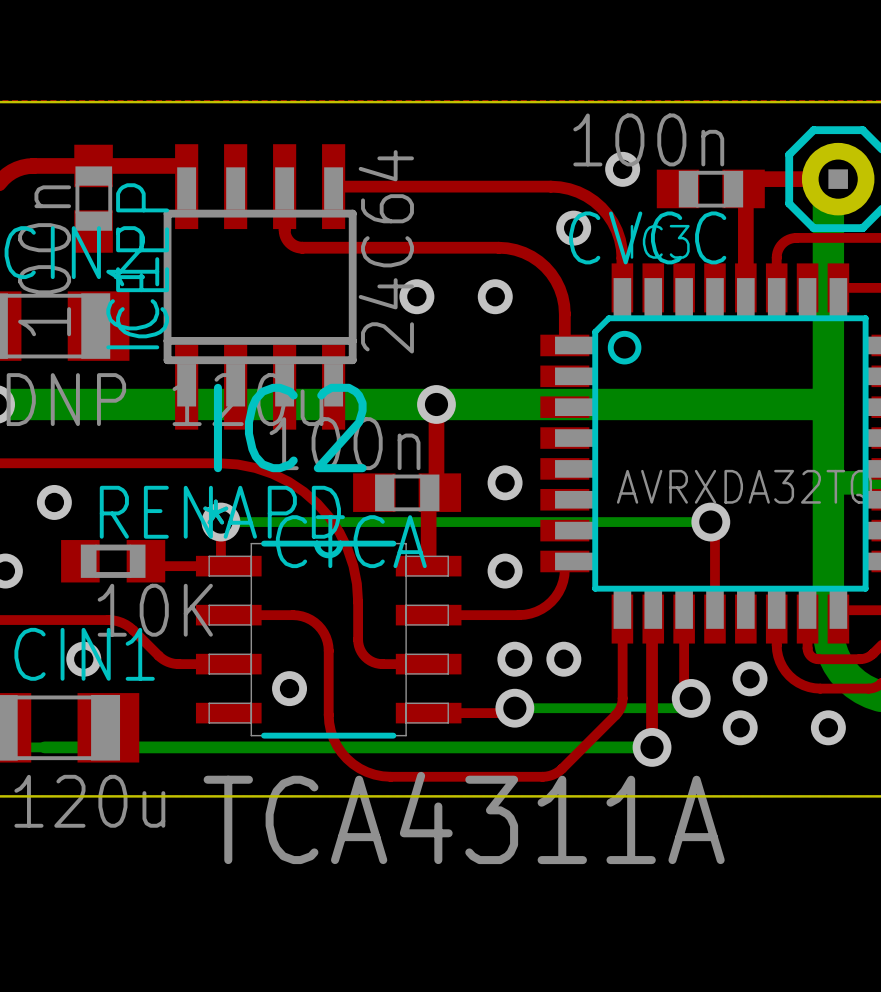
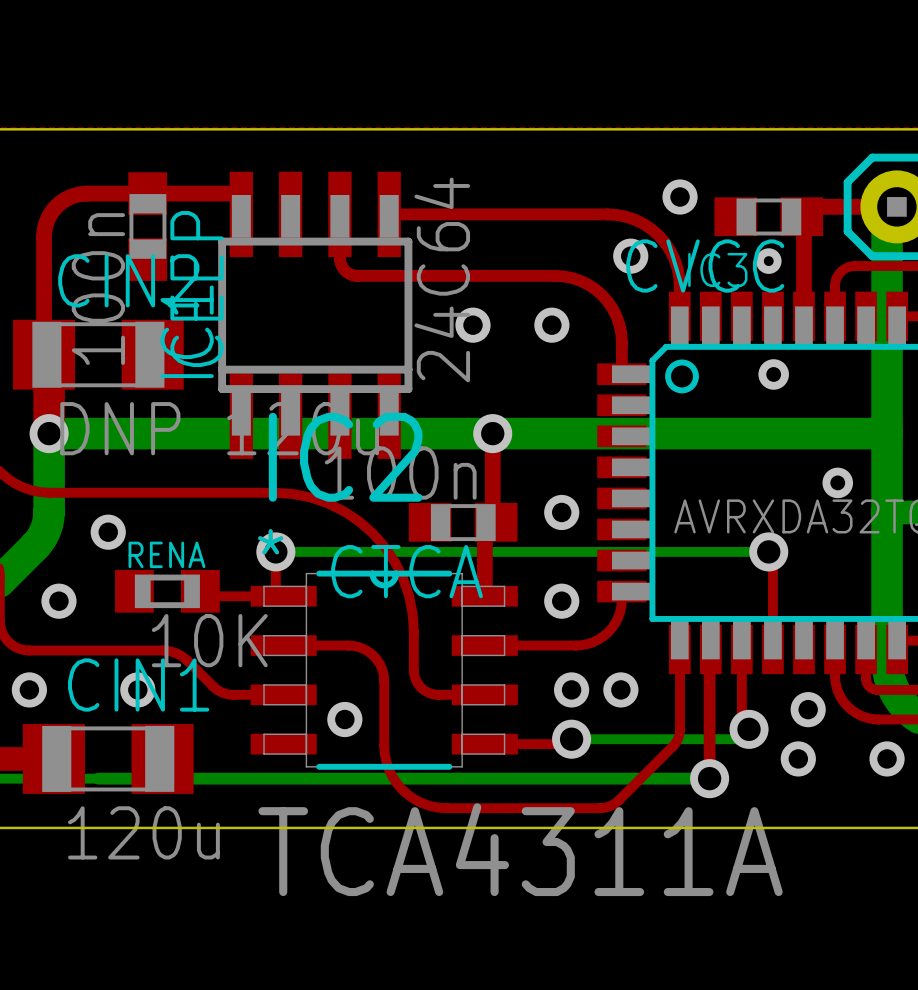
CVCC value: 100n (648, 139) -> none
via: none -> (768, 261)
via: none -> (773, 374)
via: none -> (837, 482)
RENAPD name: RENAPD (220, 512) -> RENA (166, 554)

